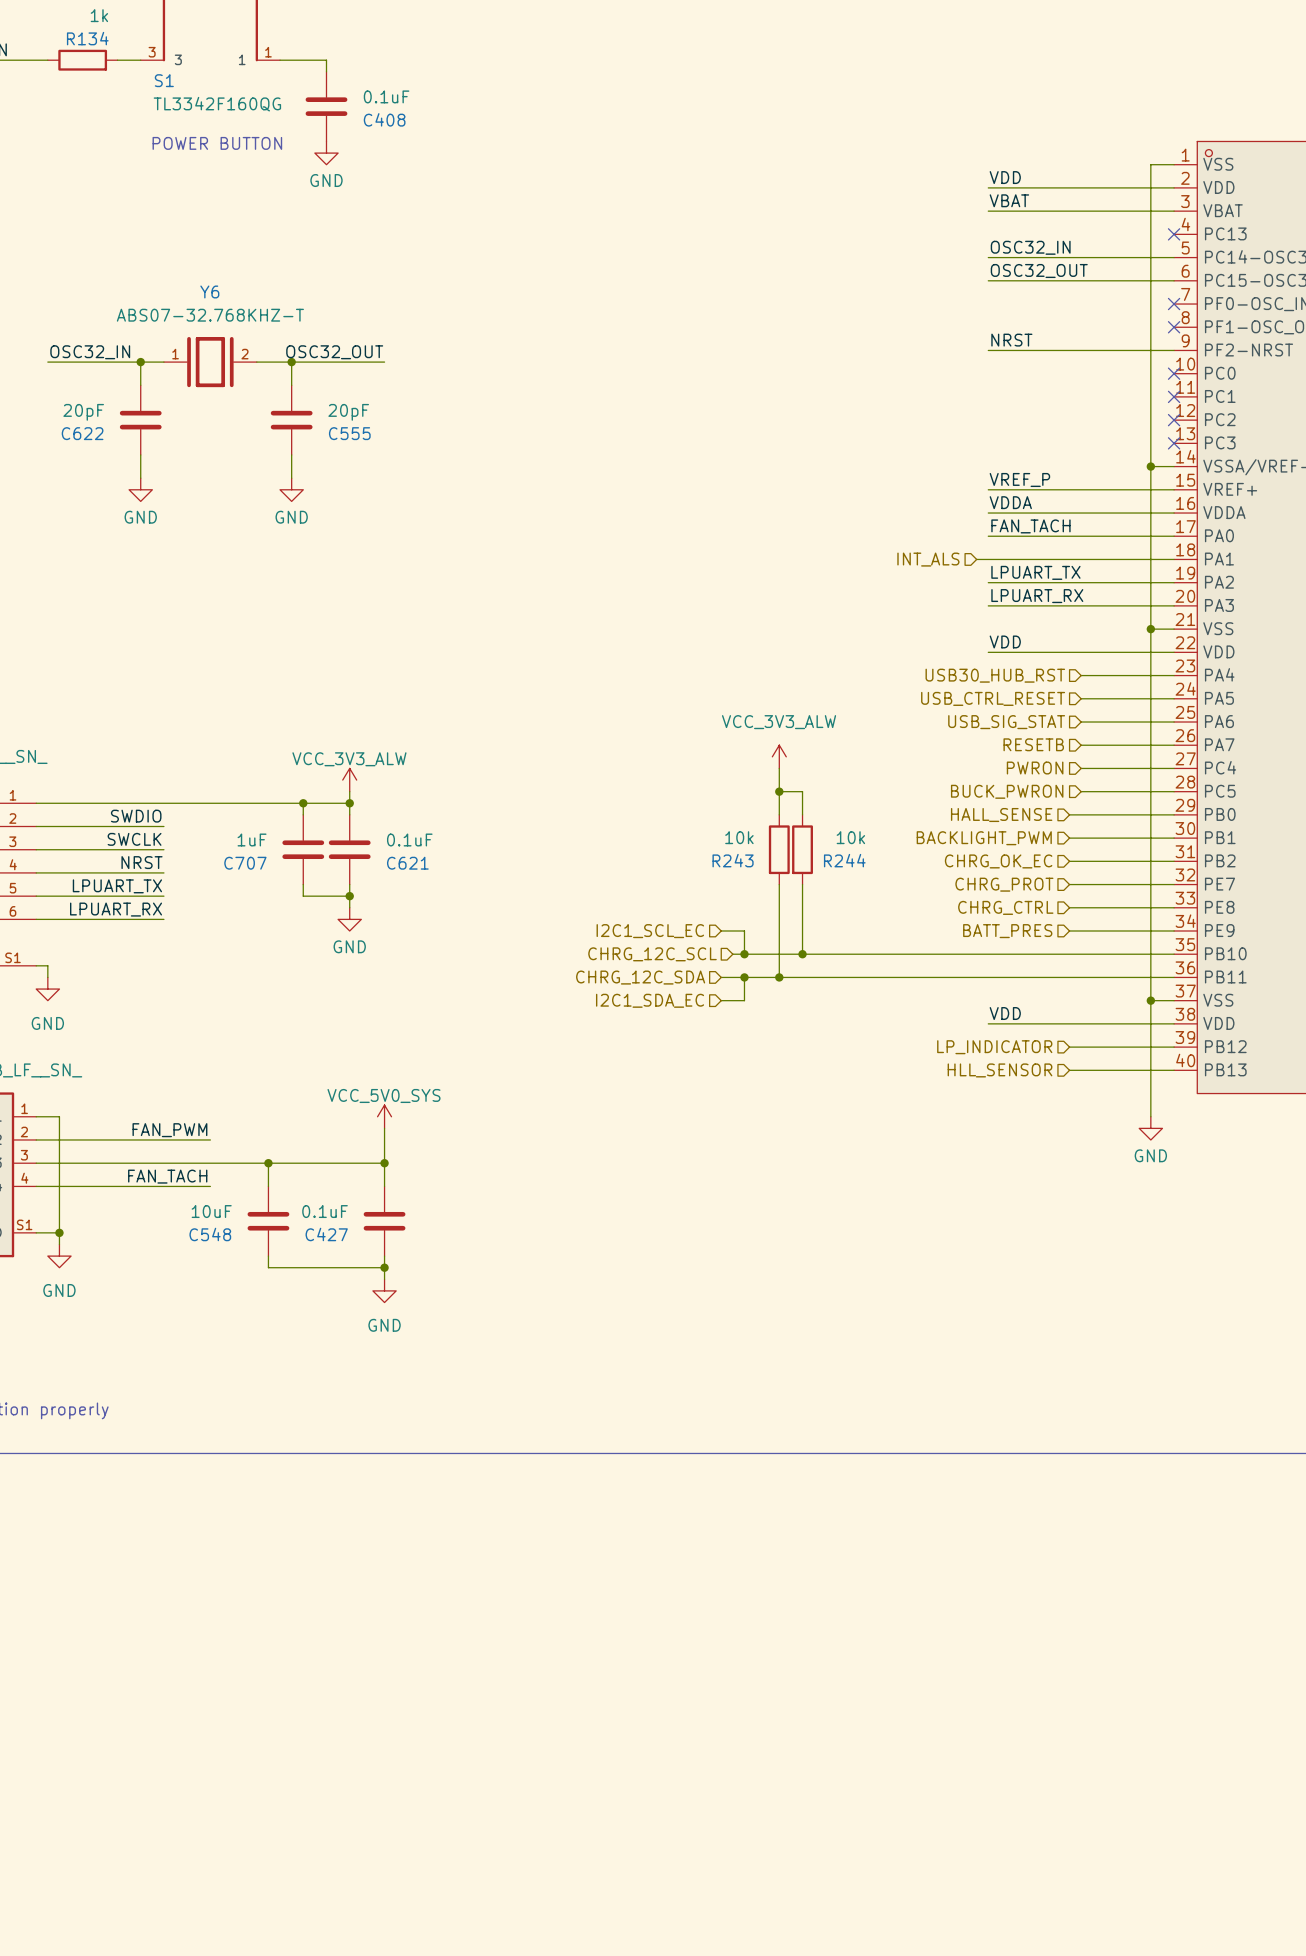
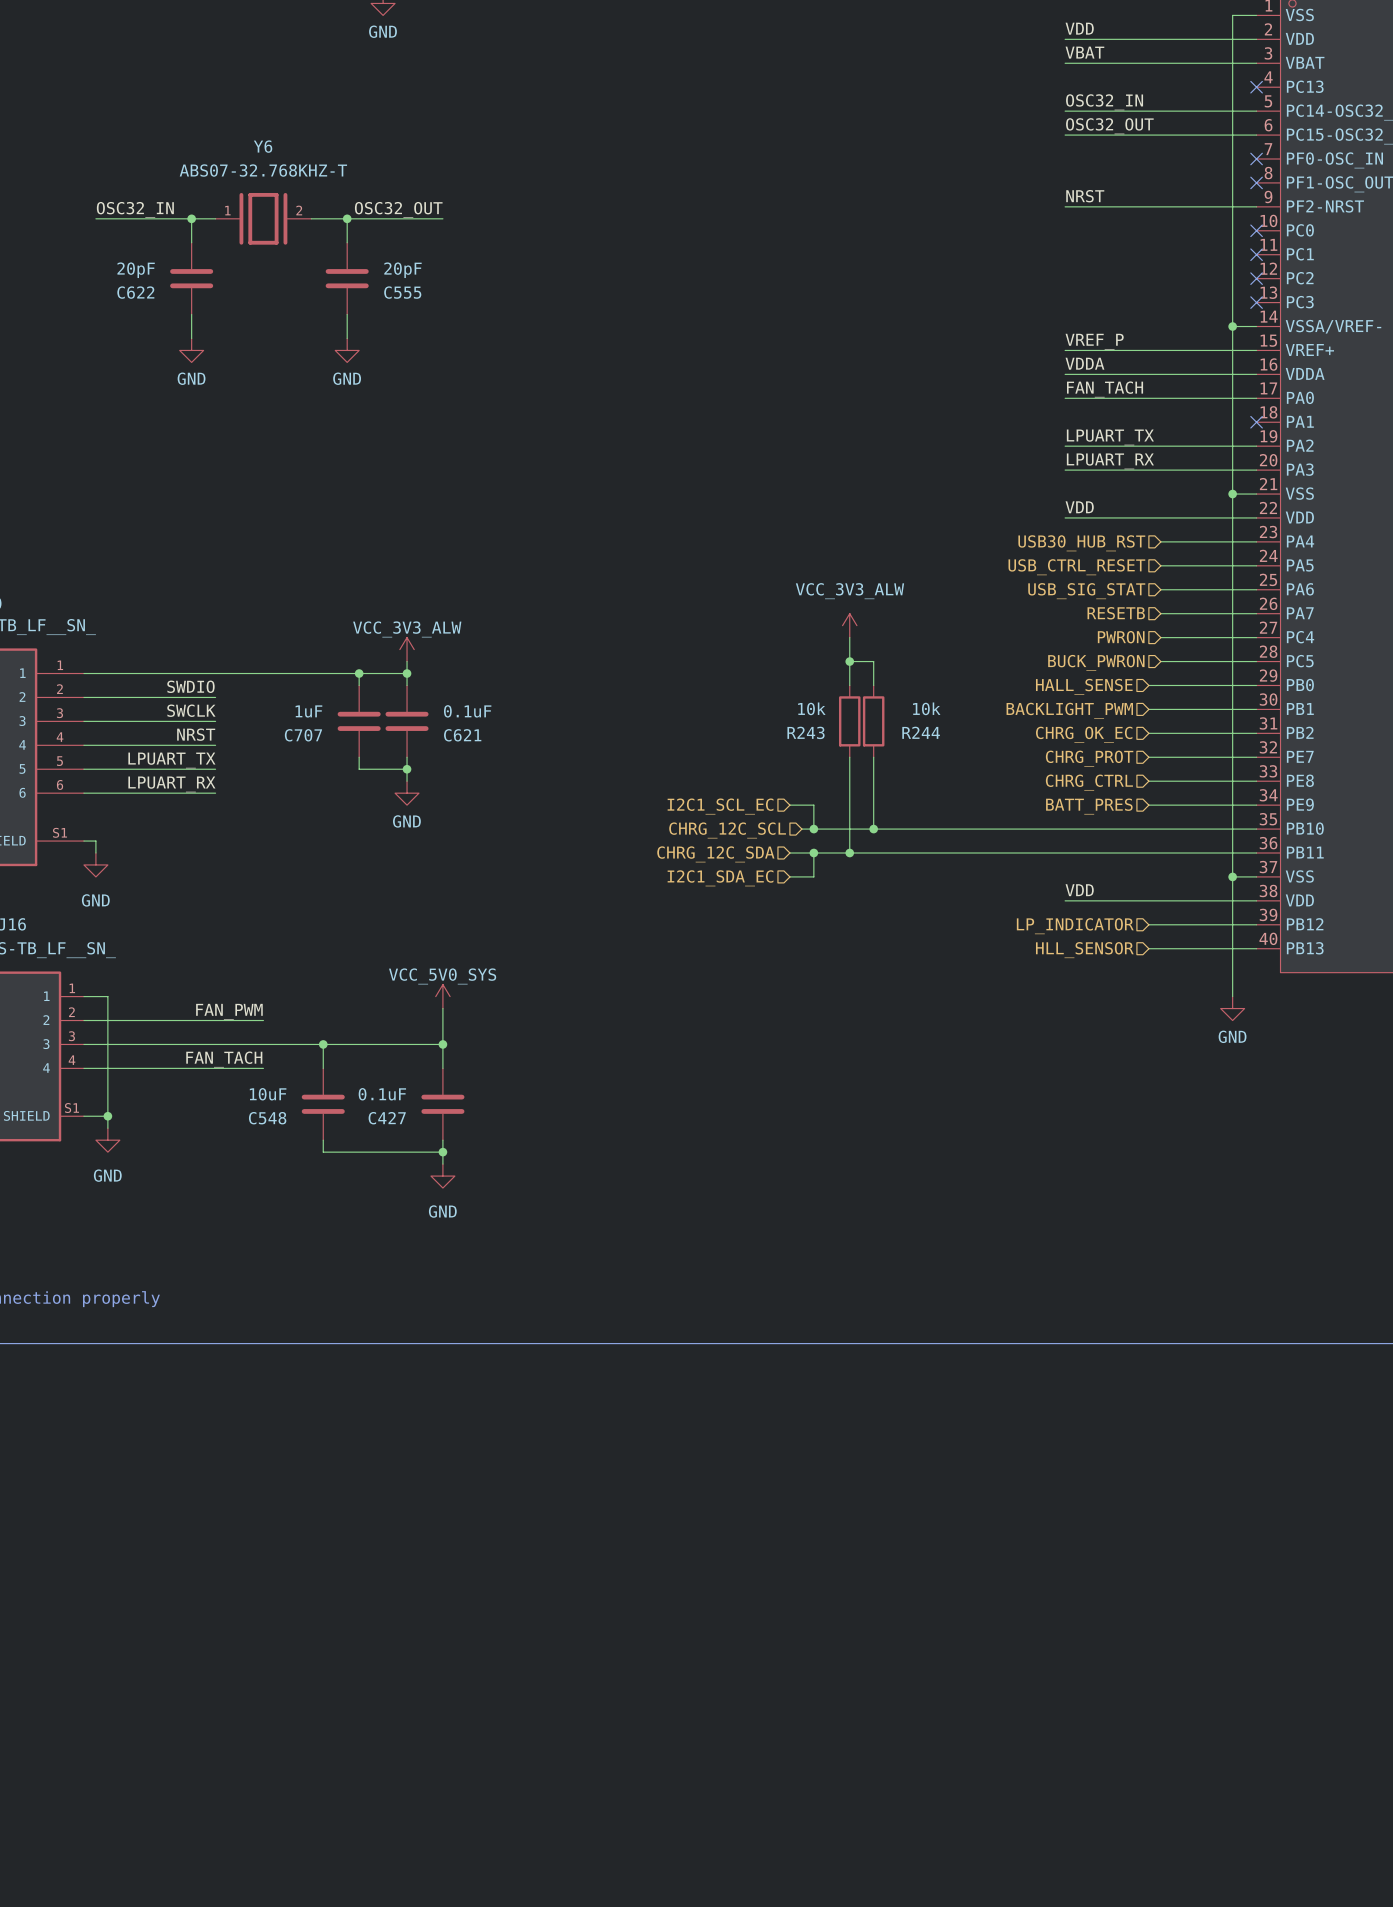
hierarchical label: INT_ALS (928, 559) -> none
wire: (976, 559) (1174, 559) -> none
no-connect mark: none -> (1256, 422)

